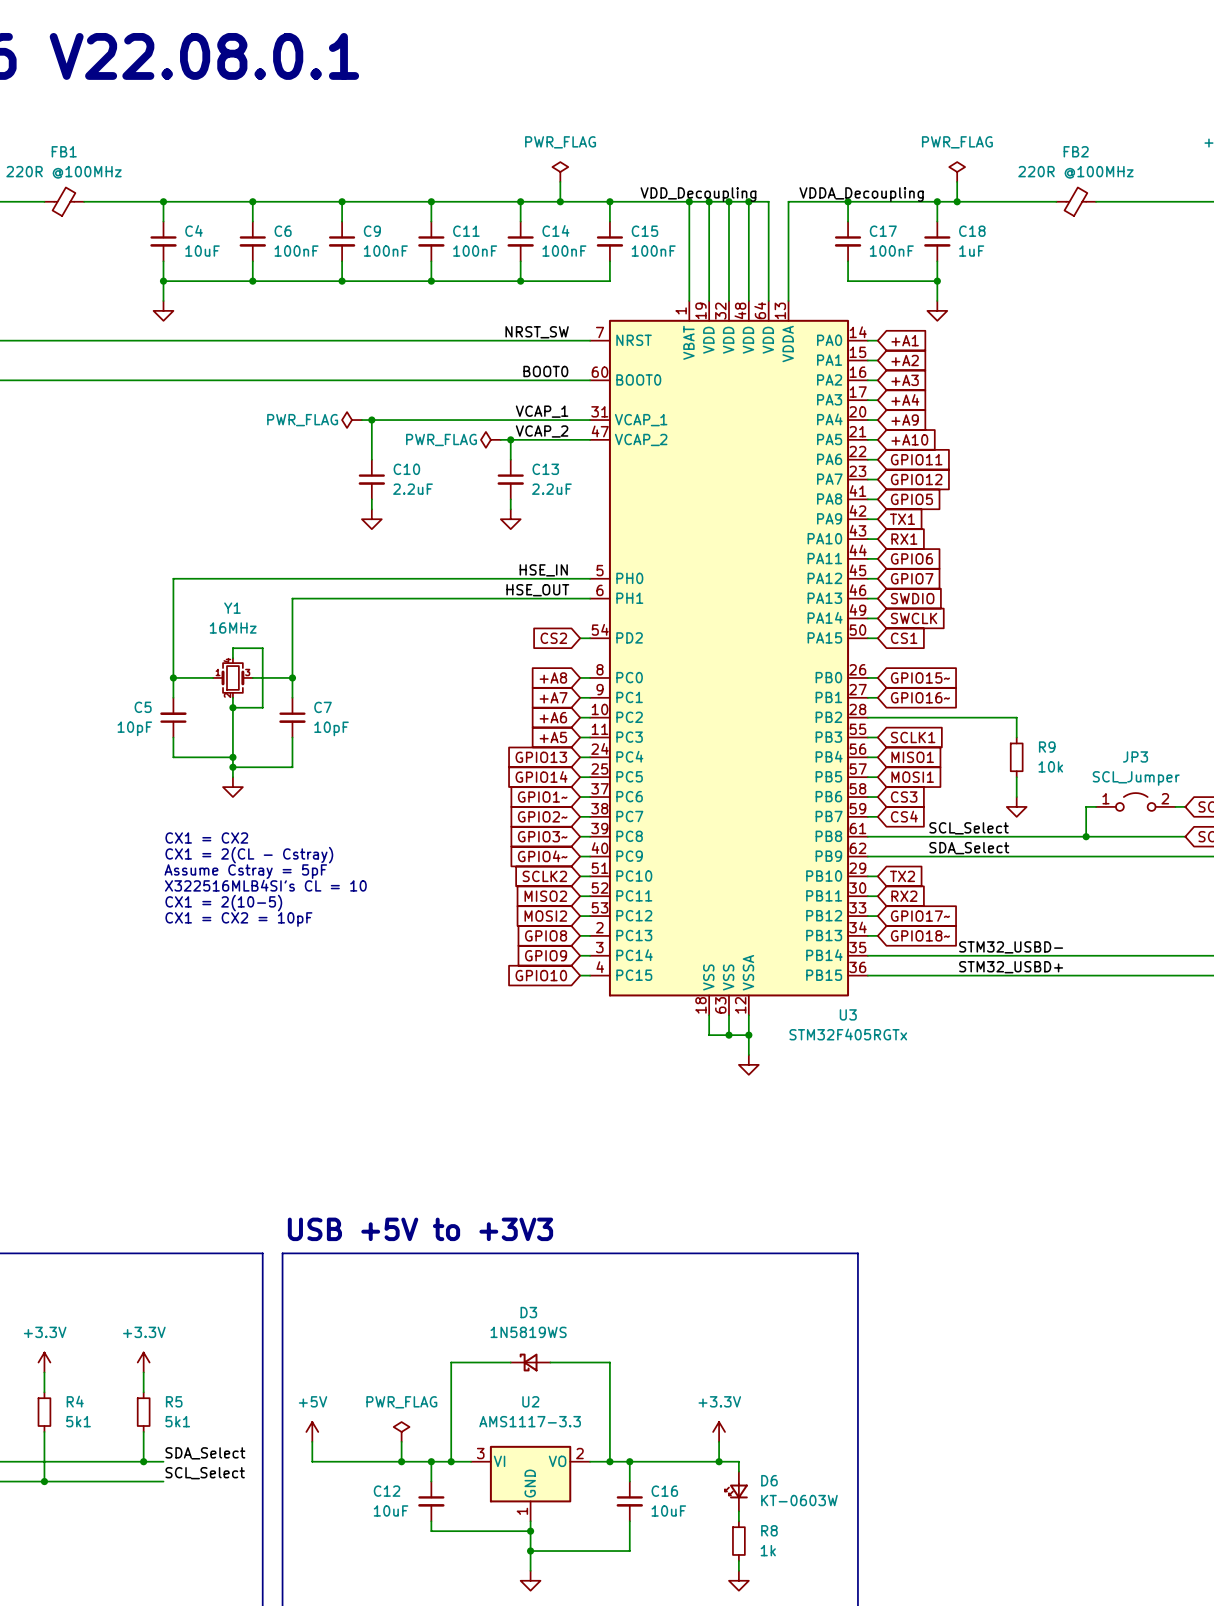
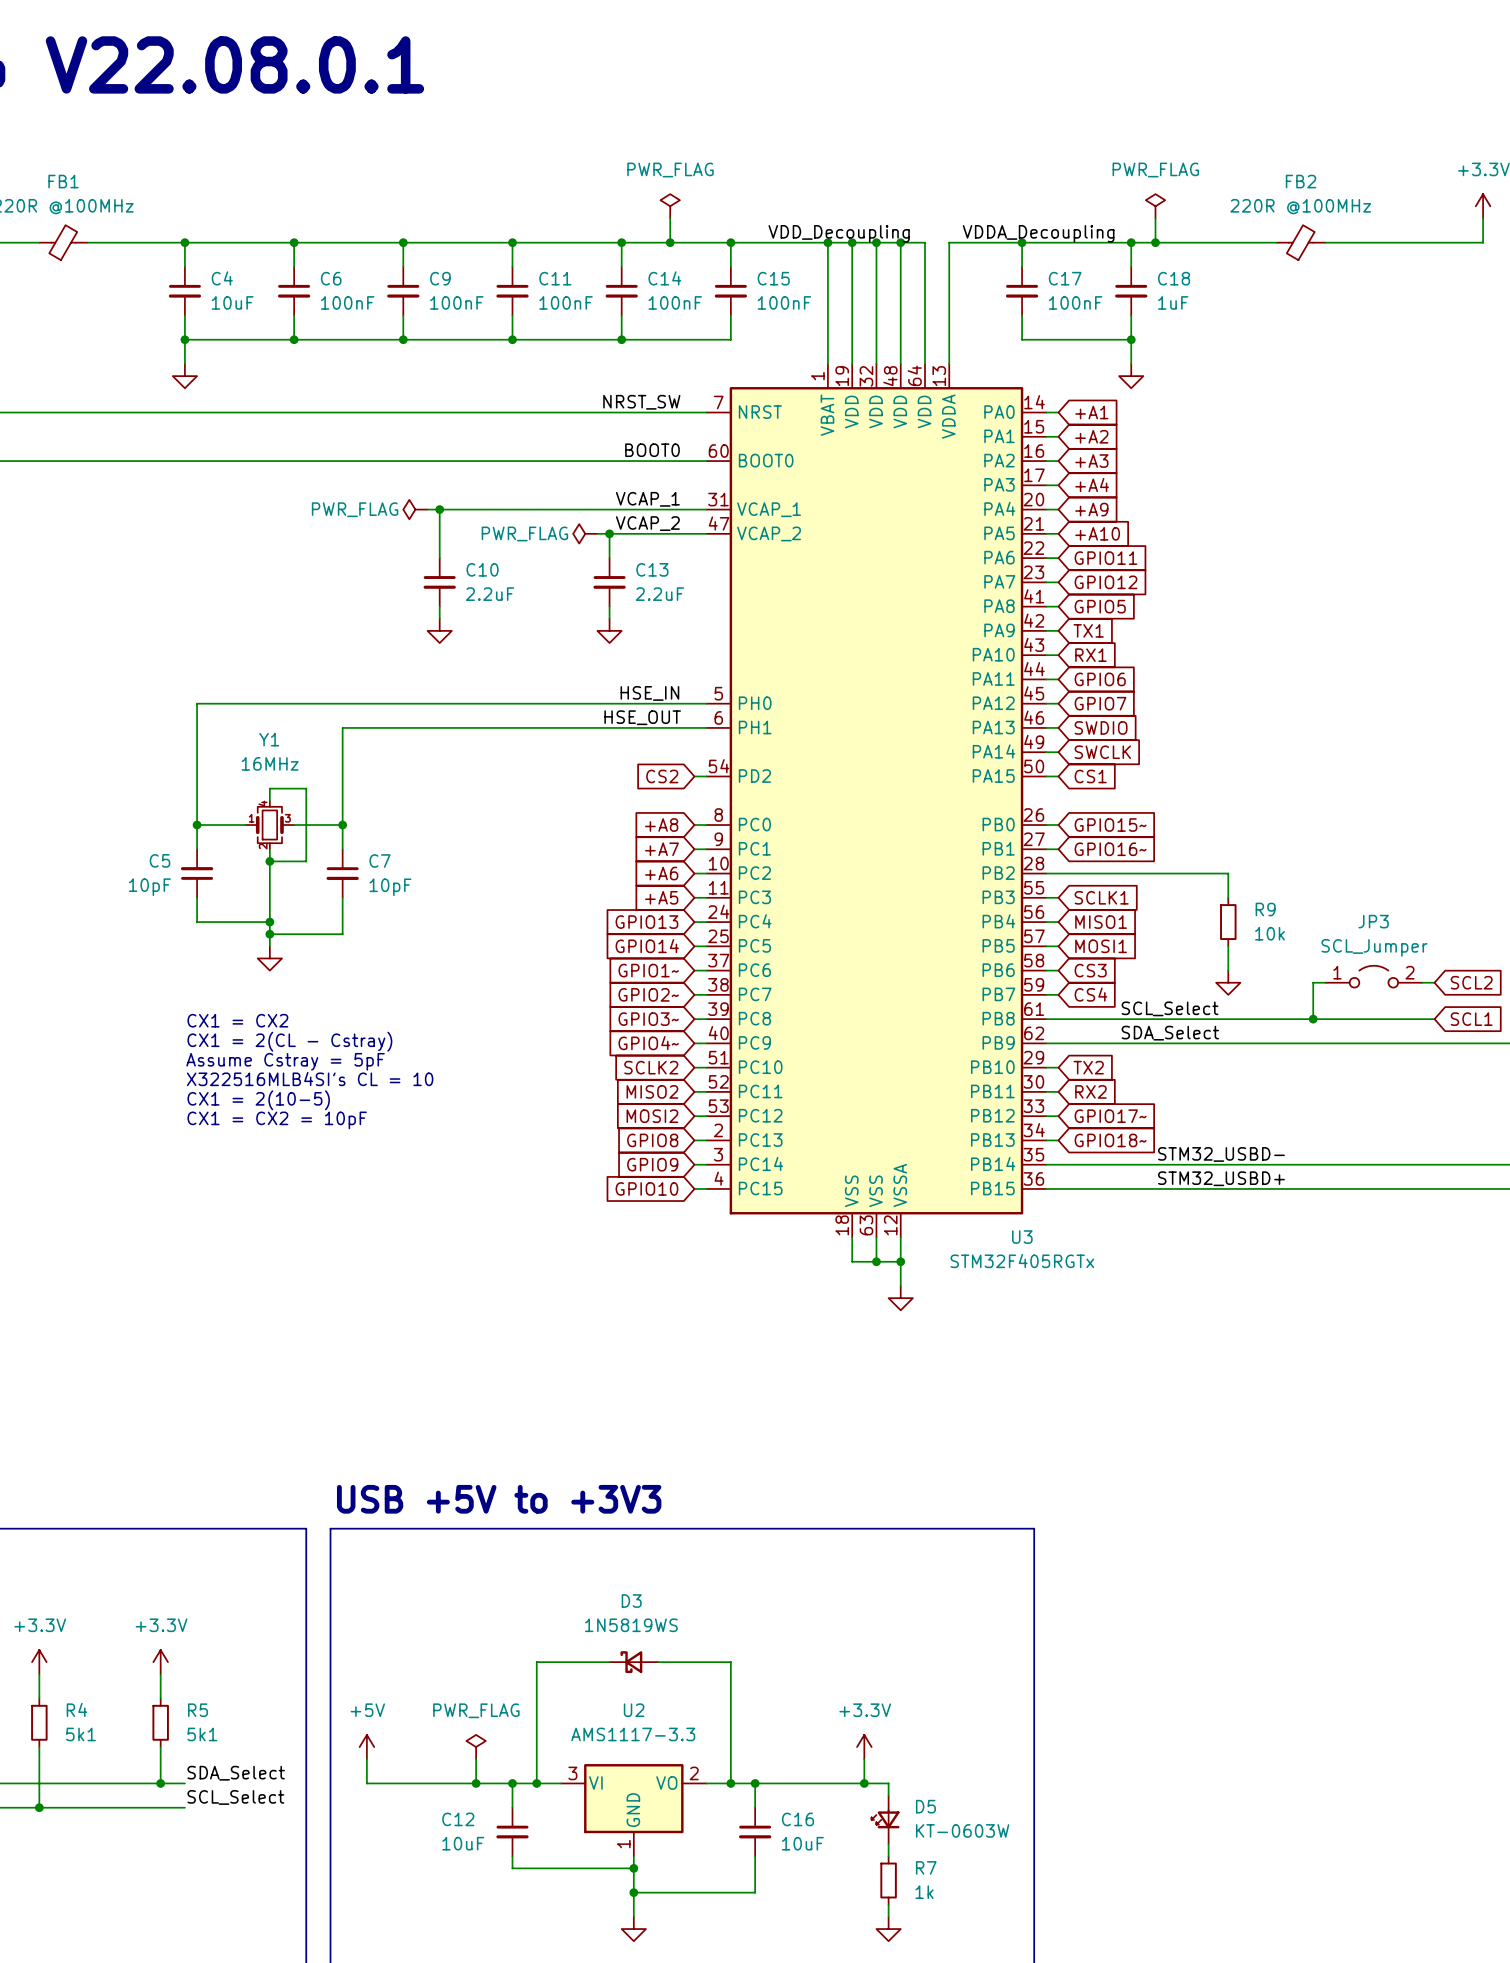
D6 name: D6 (769, 1480) -> D5 (925, 1806)
R8 name: R8 (769, 1530) -> R7 (926, 1867)

